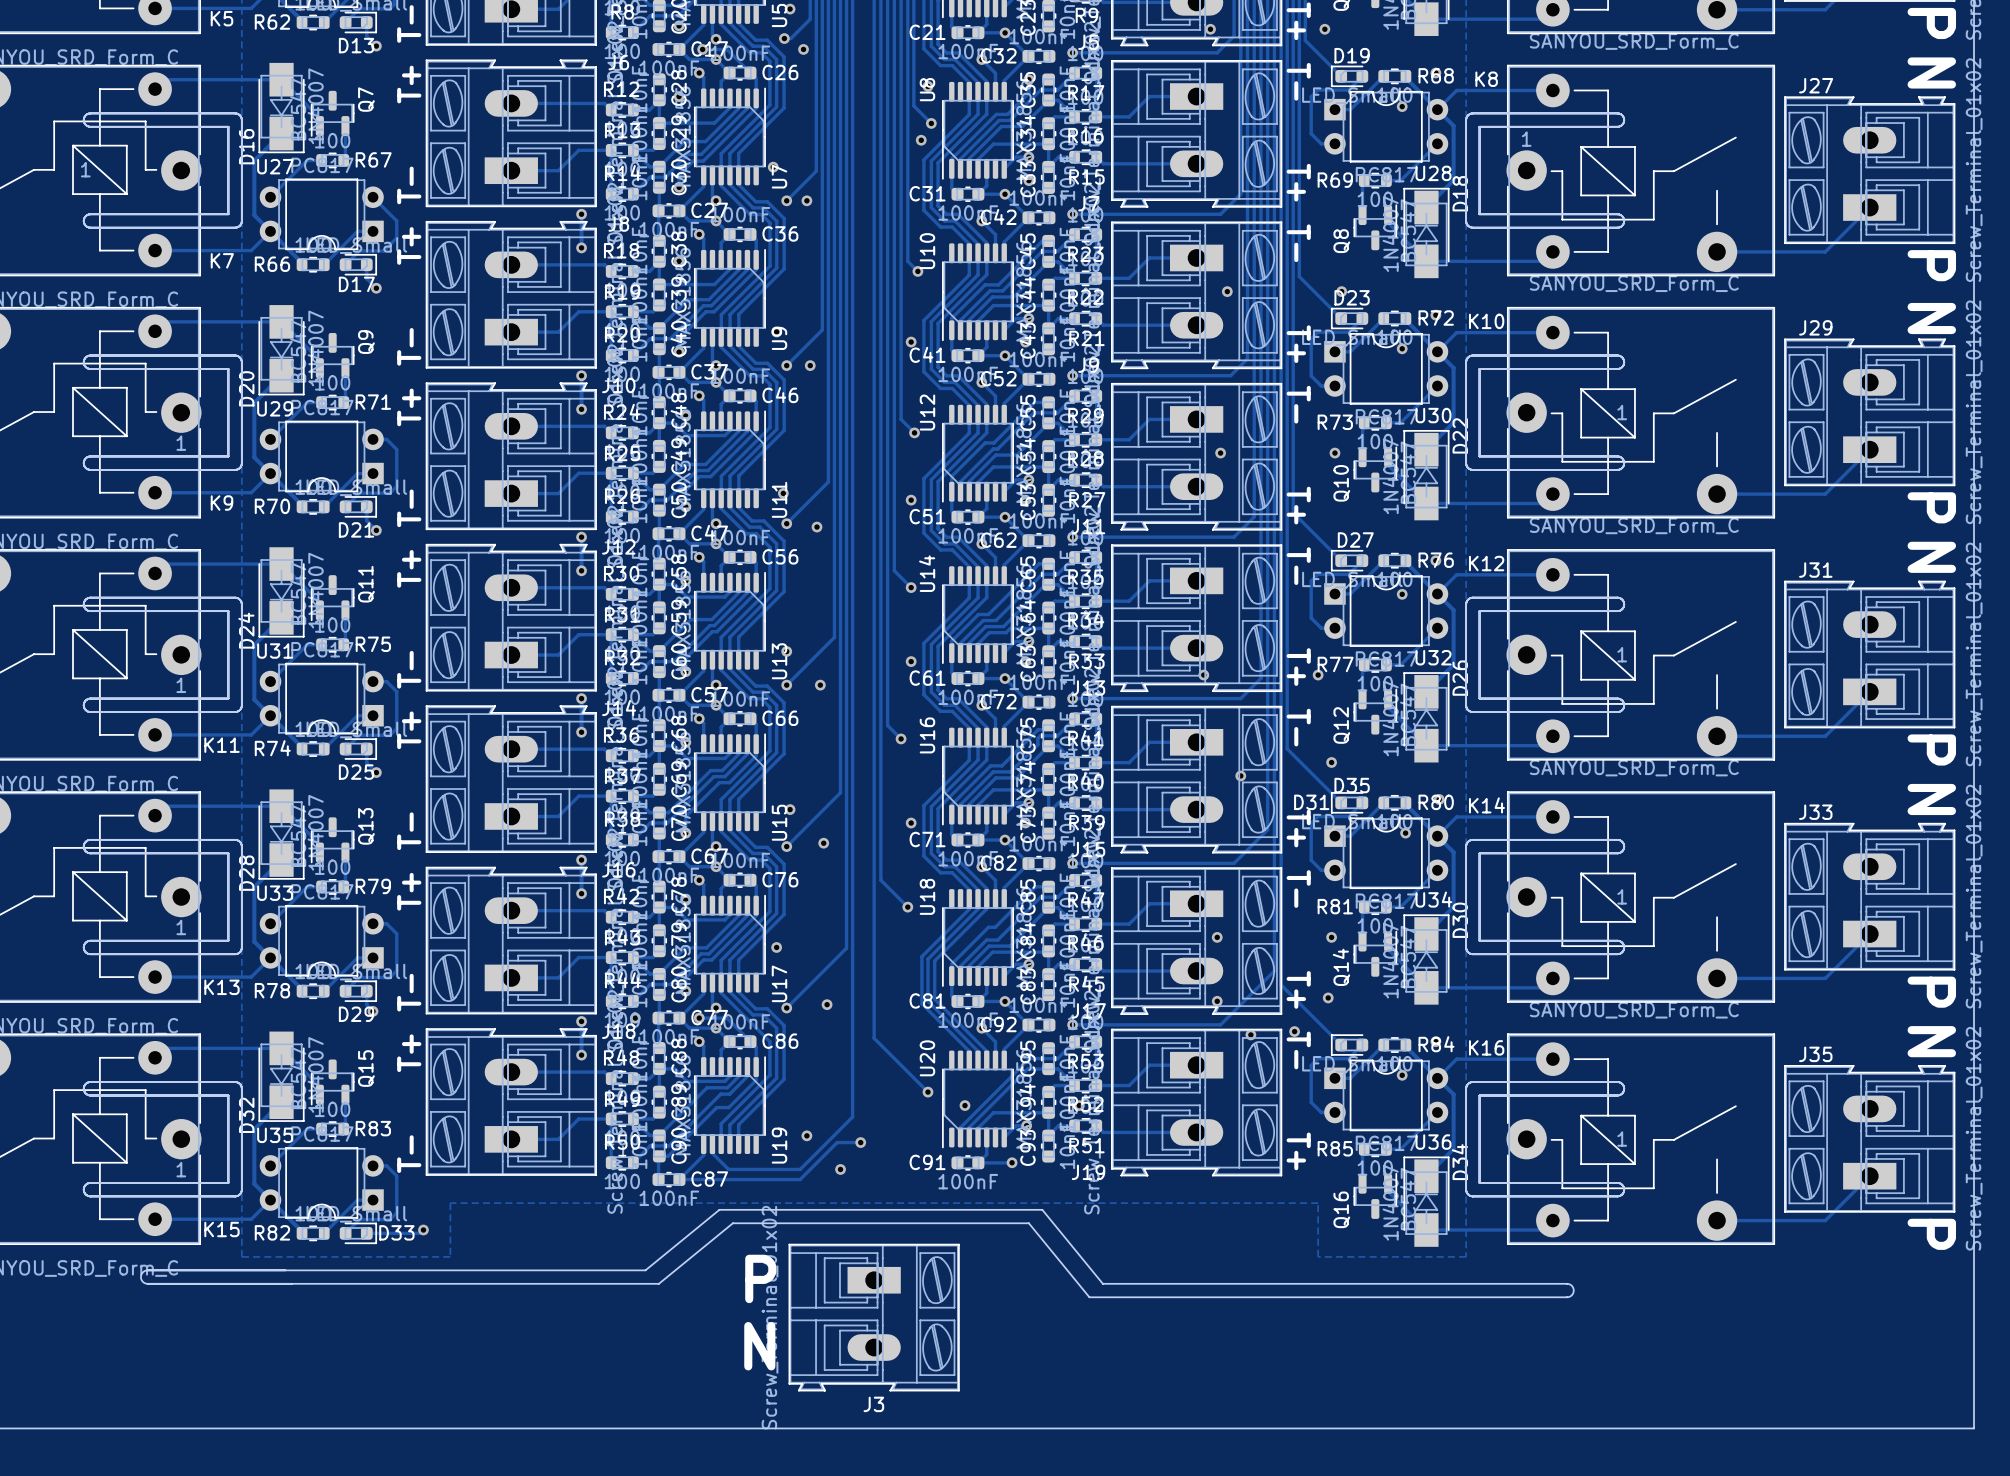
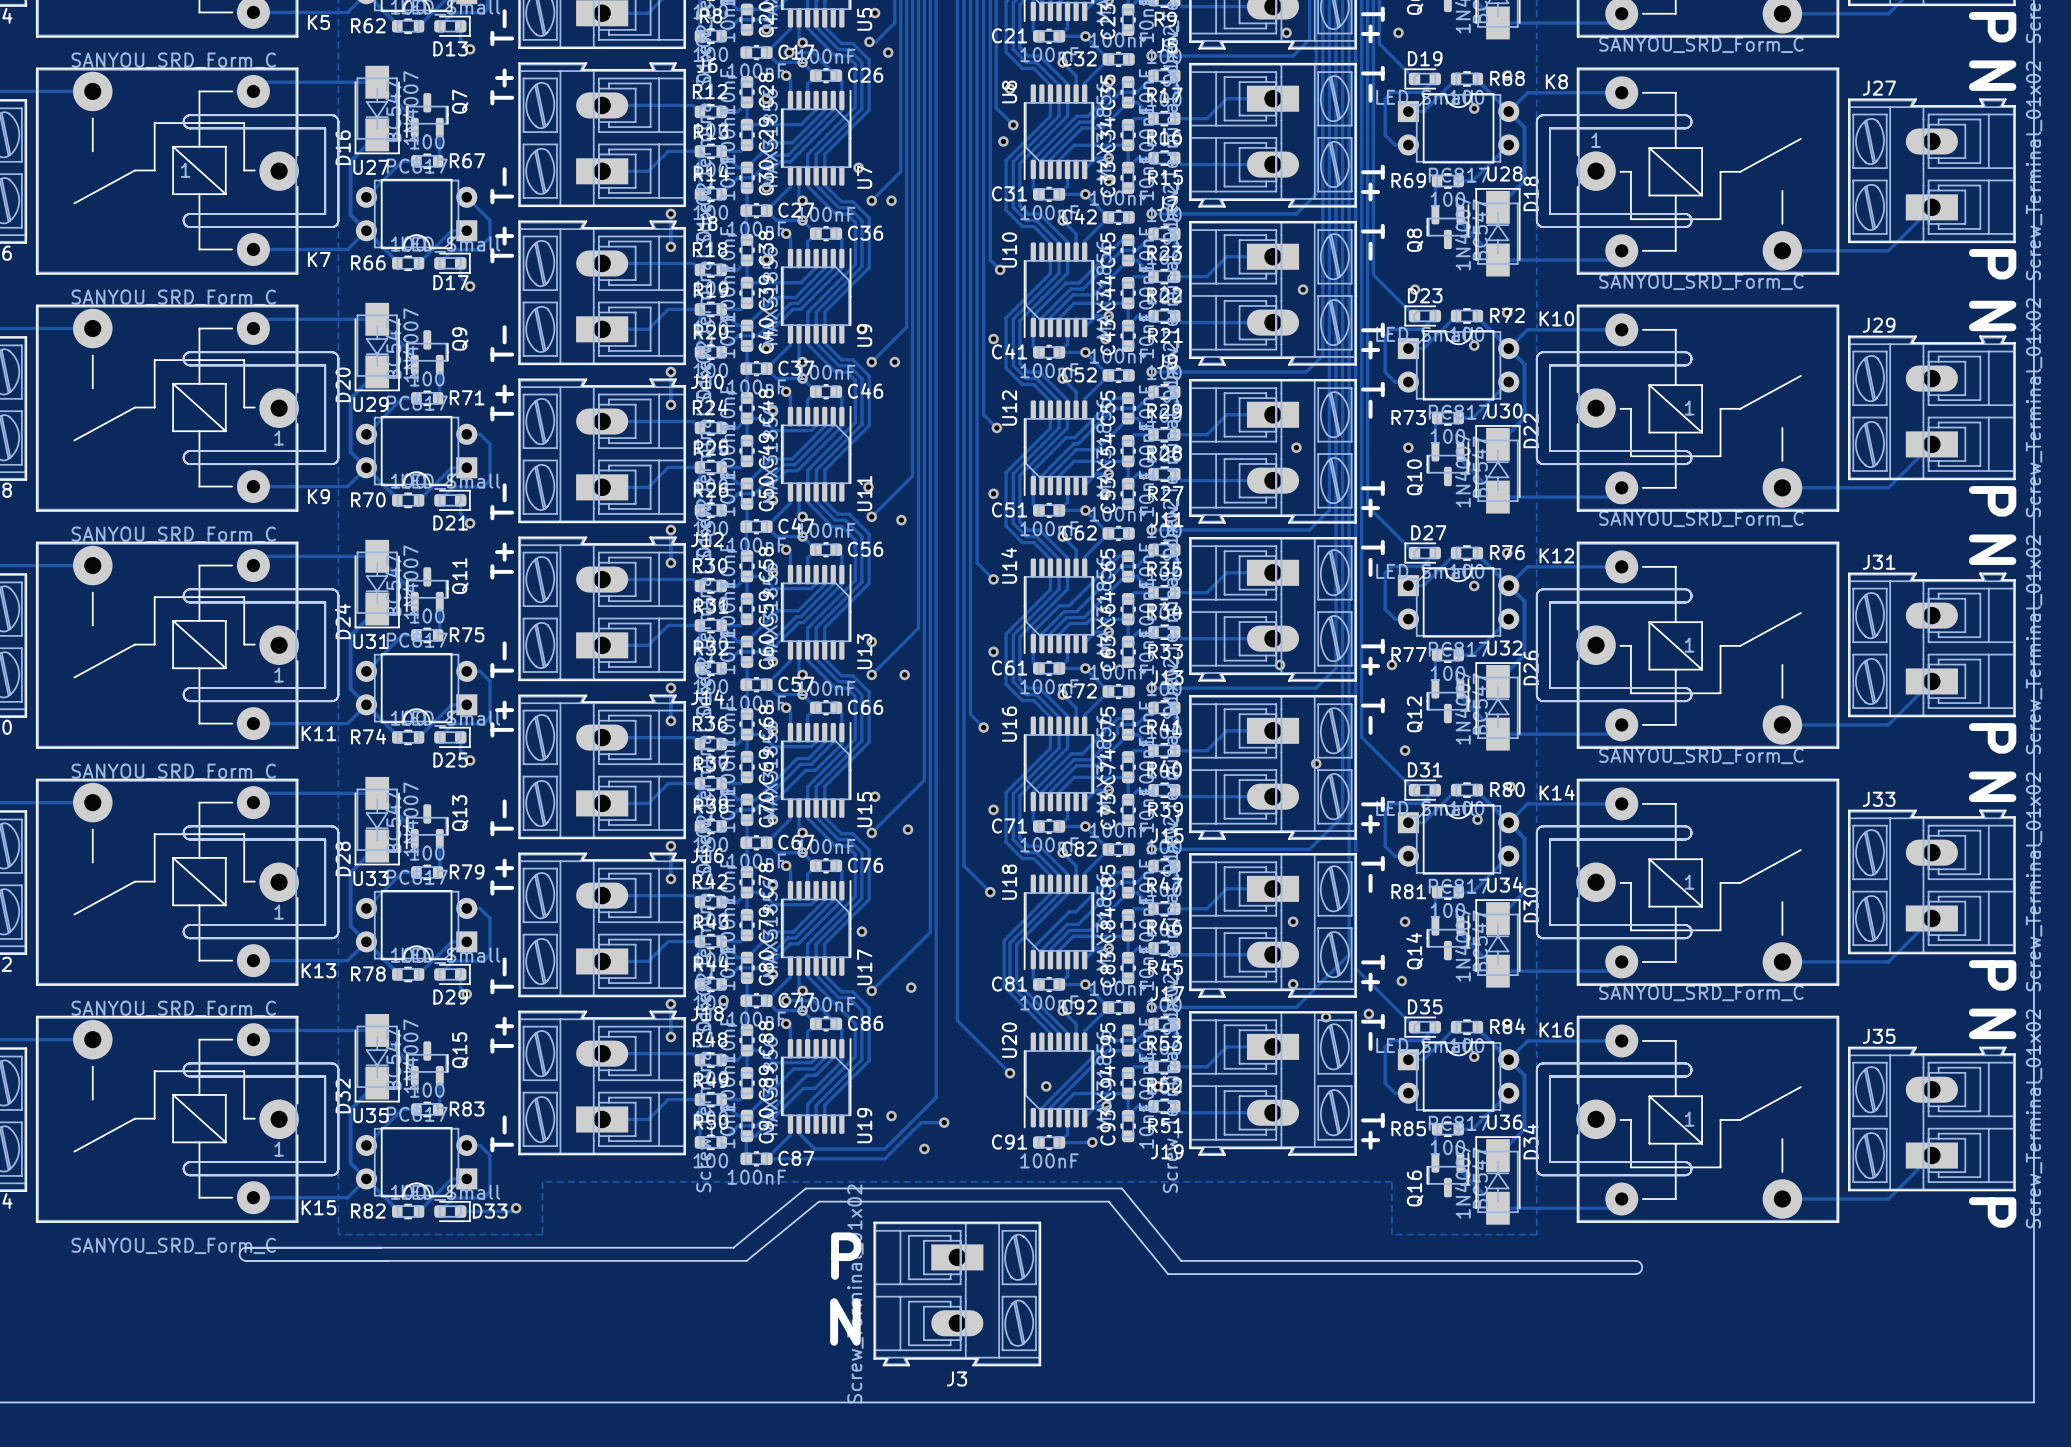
D35 name position: D35 (1352, 785) -> D35 (1425, 1006)
D31 name position: D31 (1311, 802) -> D31 (1425, 769)

